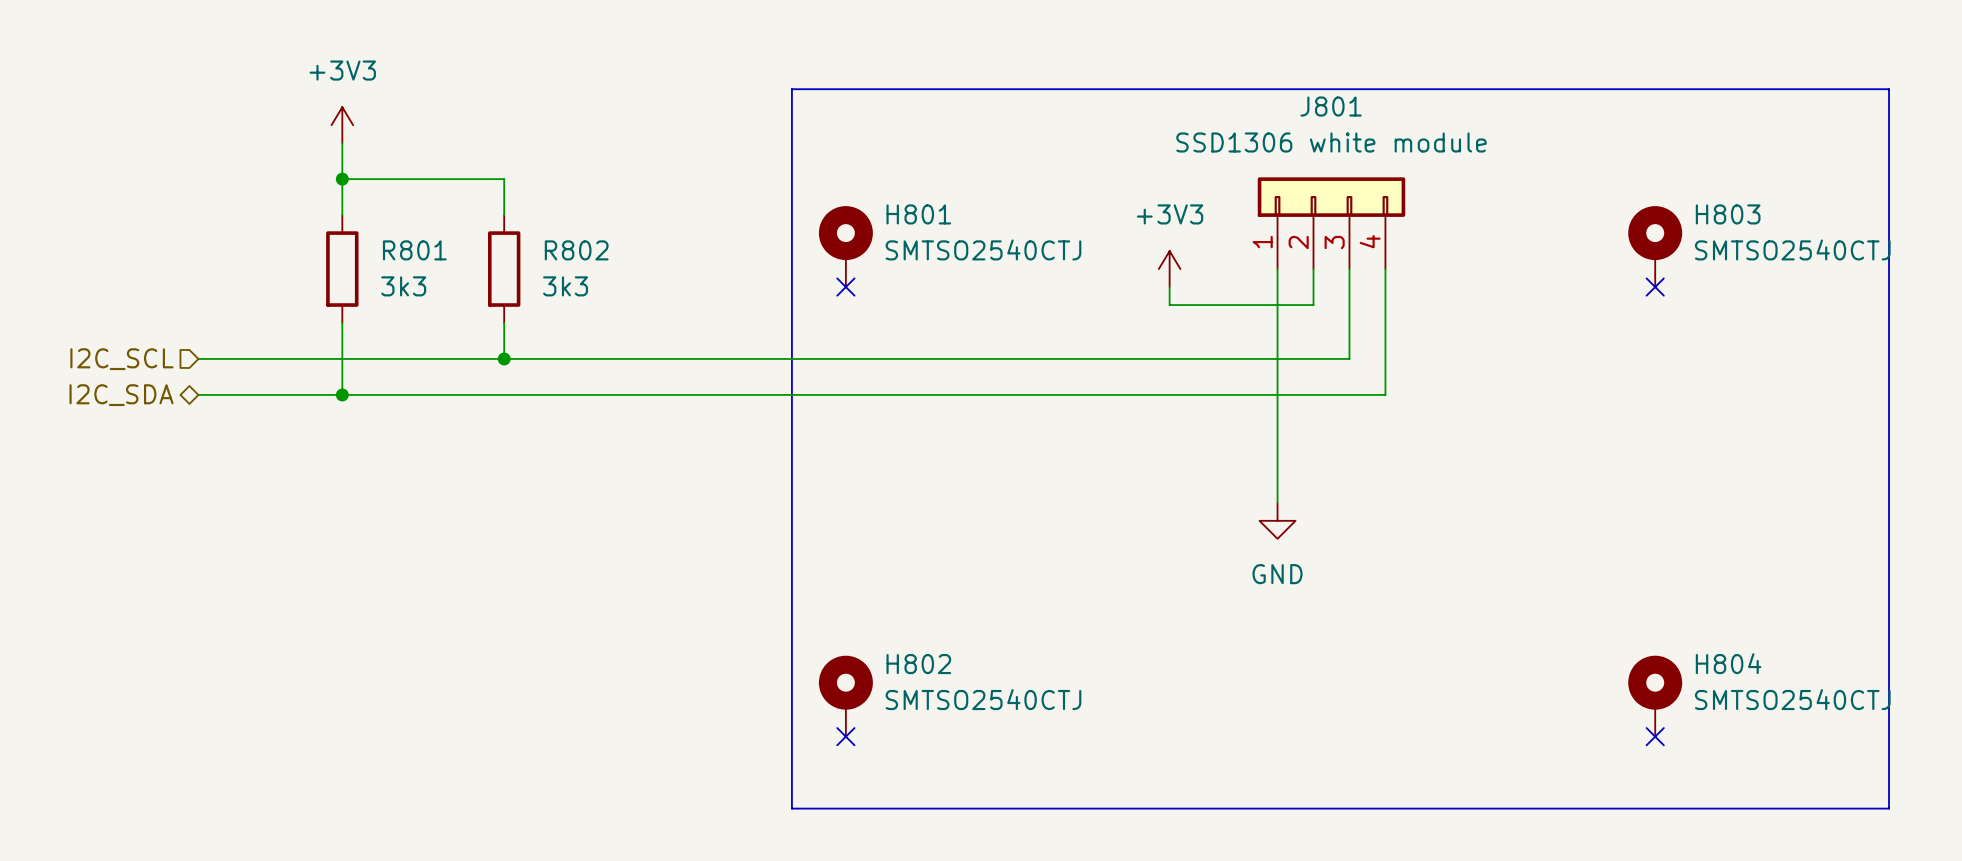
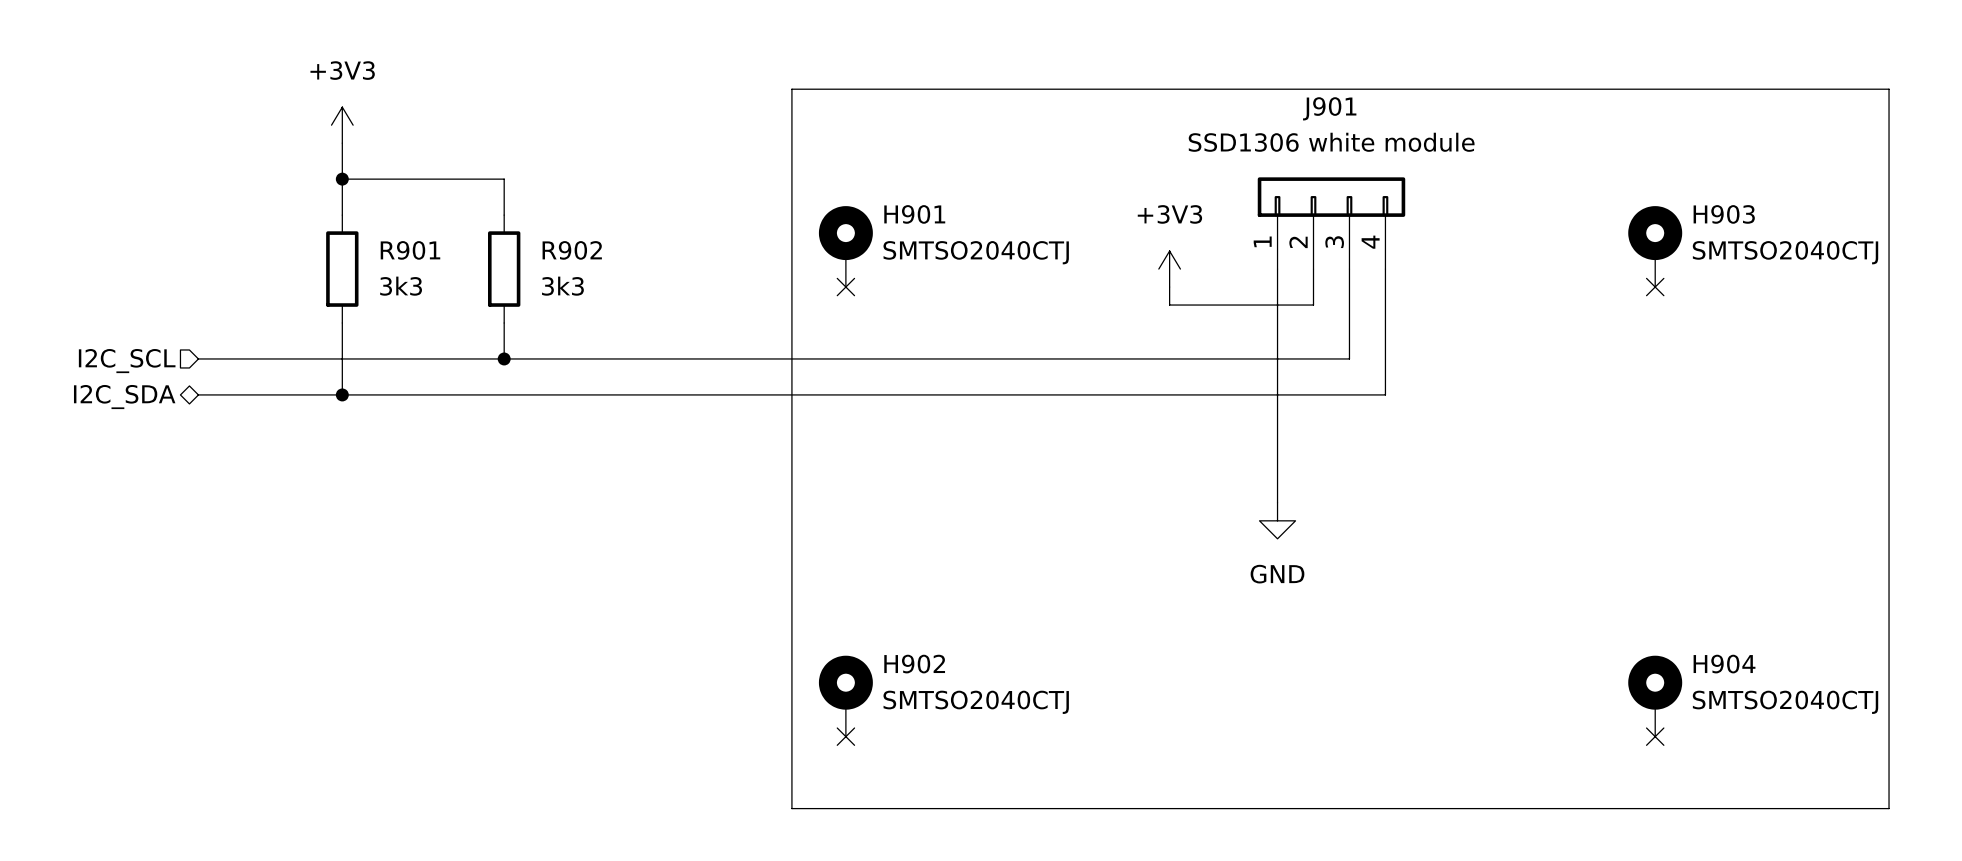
J801 name: J801 (1331, 106) -> J901 (1329, 108)
H801 name: H801 (918, 214) -> H901 (914, 214)
H803 name: H803 (1728, 214) -> H903 (1724, 214)
H801 value: SMTSO2540CTJ (983, 249) -> SMTSO2040CTJ (976, 252)
H803 value: SMTSO2540CTJ (1792, 249) -> SMTSO2040CTJ (1785, 252)
R801 name: R801 (414, 250) -> R901 (410, 250)
R802 name: R802 (576, 250) -> R902 (572, 250)
H804 name: H804 (1728, 663) -> H904 (1724, 664)
H802 name: H802 (918, 664) -> H902 (914, 664)
H802 value: SMTSO2540CTJ (983, 699) -> SMTSO2040CTJ (976, 702)
H804 value: SMTSO2540CTJ (1792, 699) -> SMTSO2040CTJ (1785, 702)

